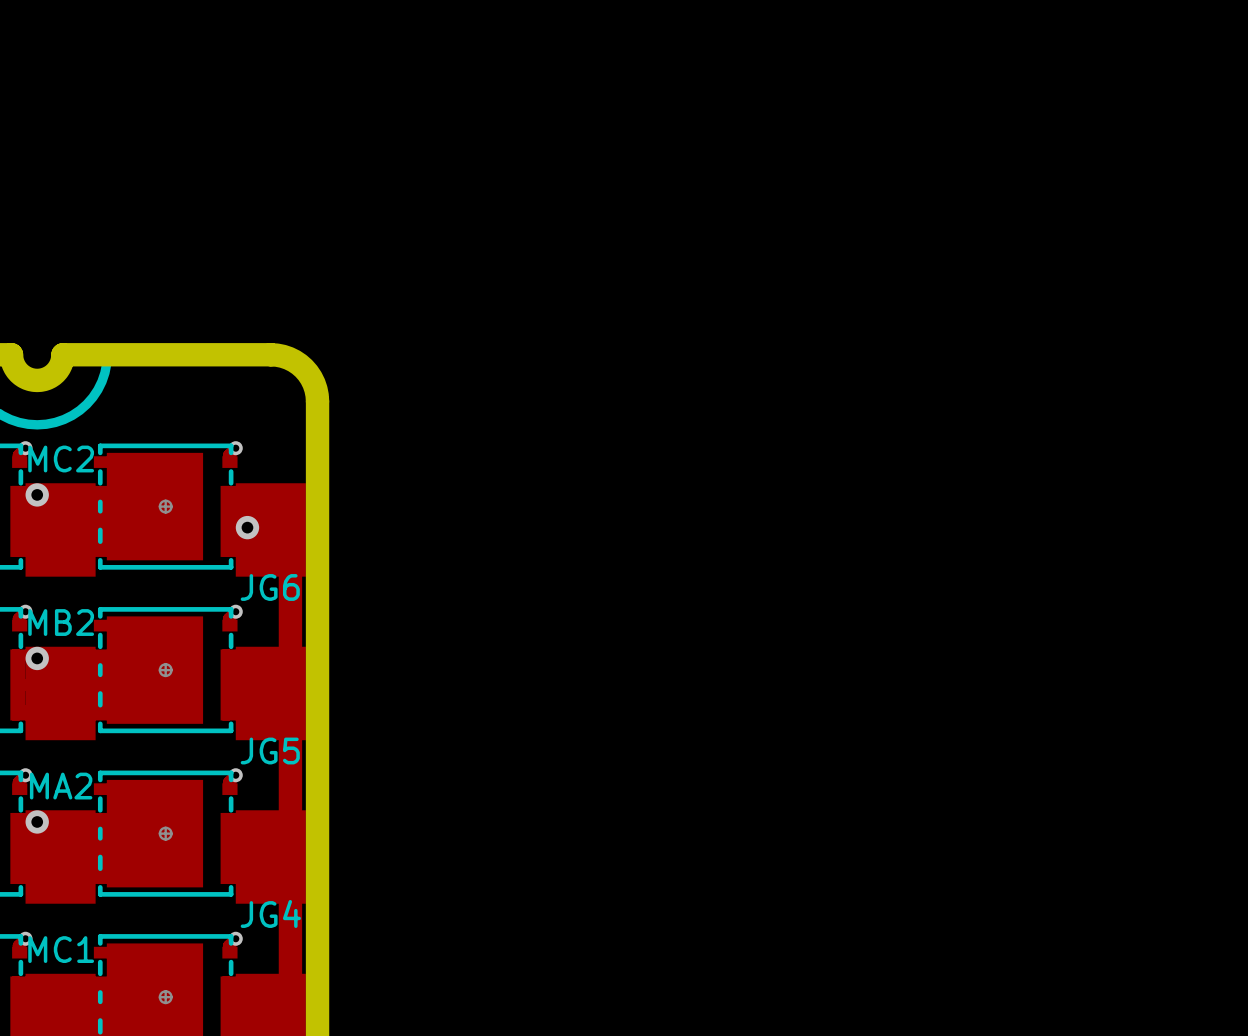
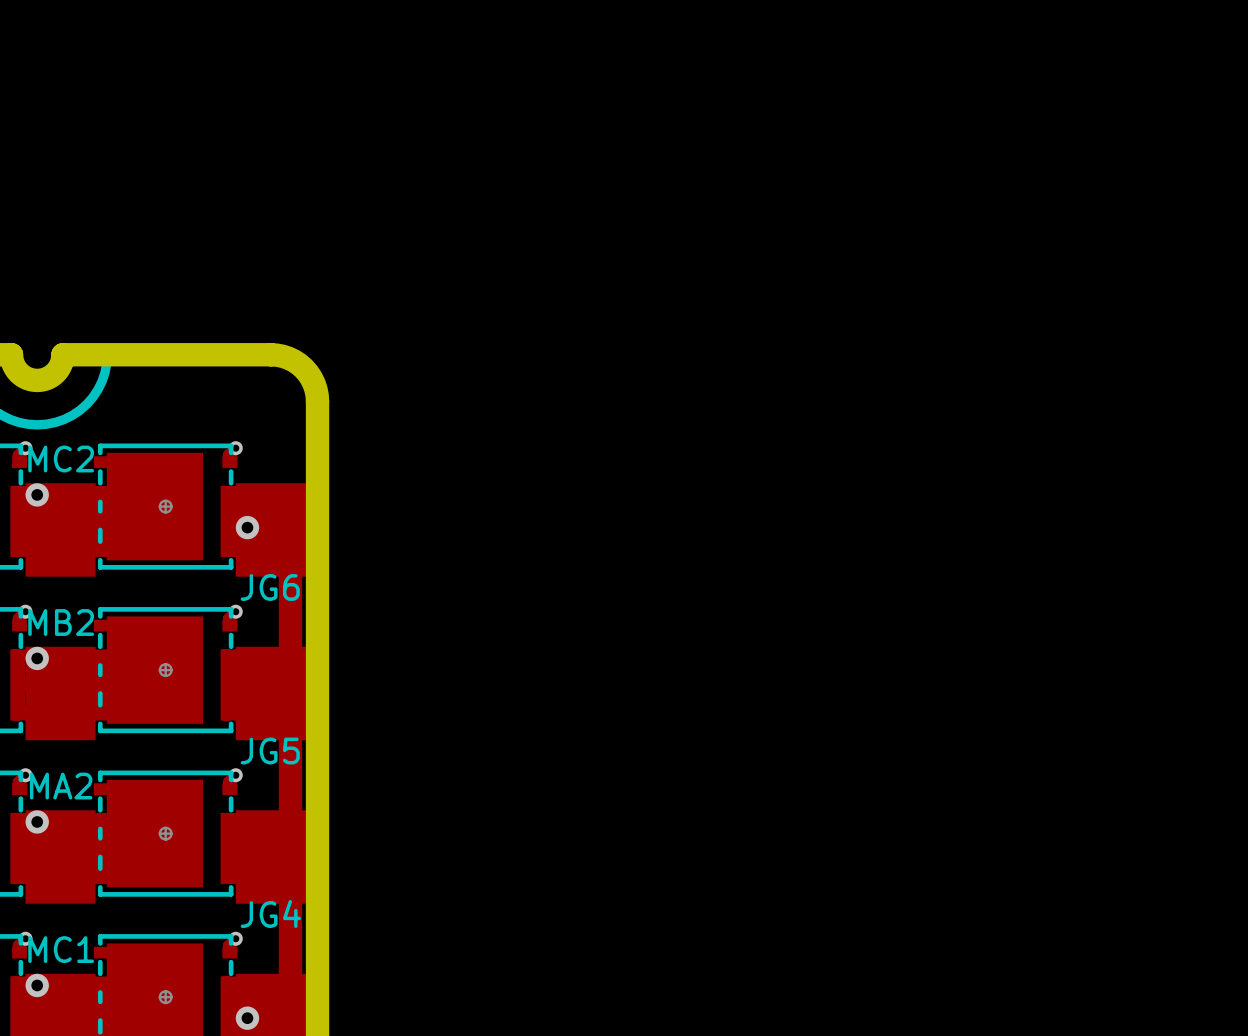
via: none -> (37, 985)
via: none -> (247, 1018)

